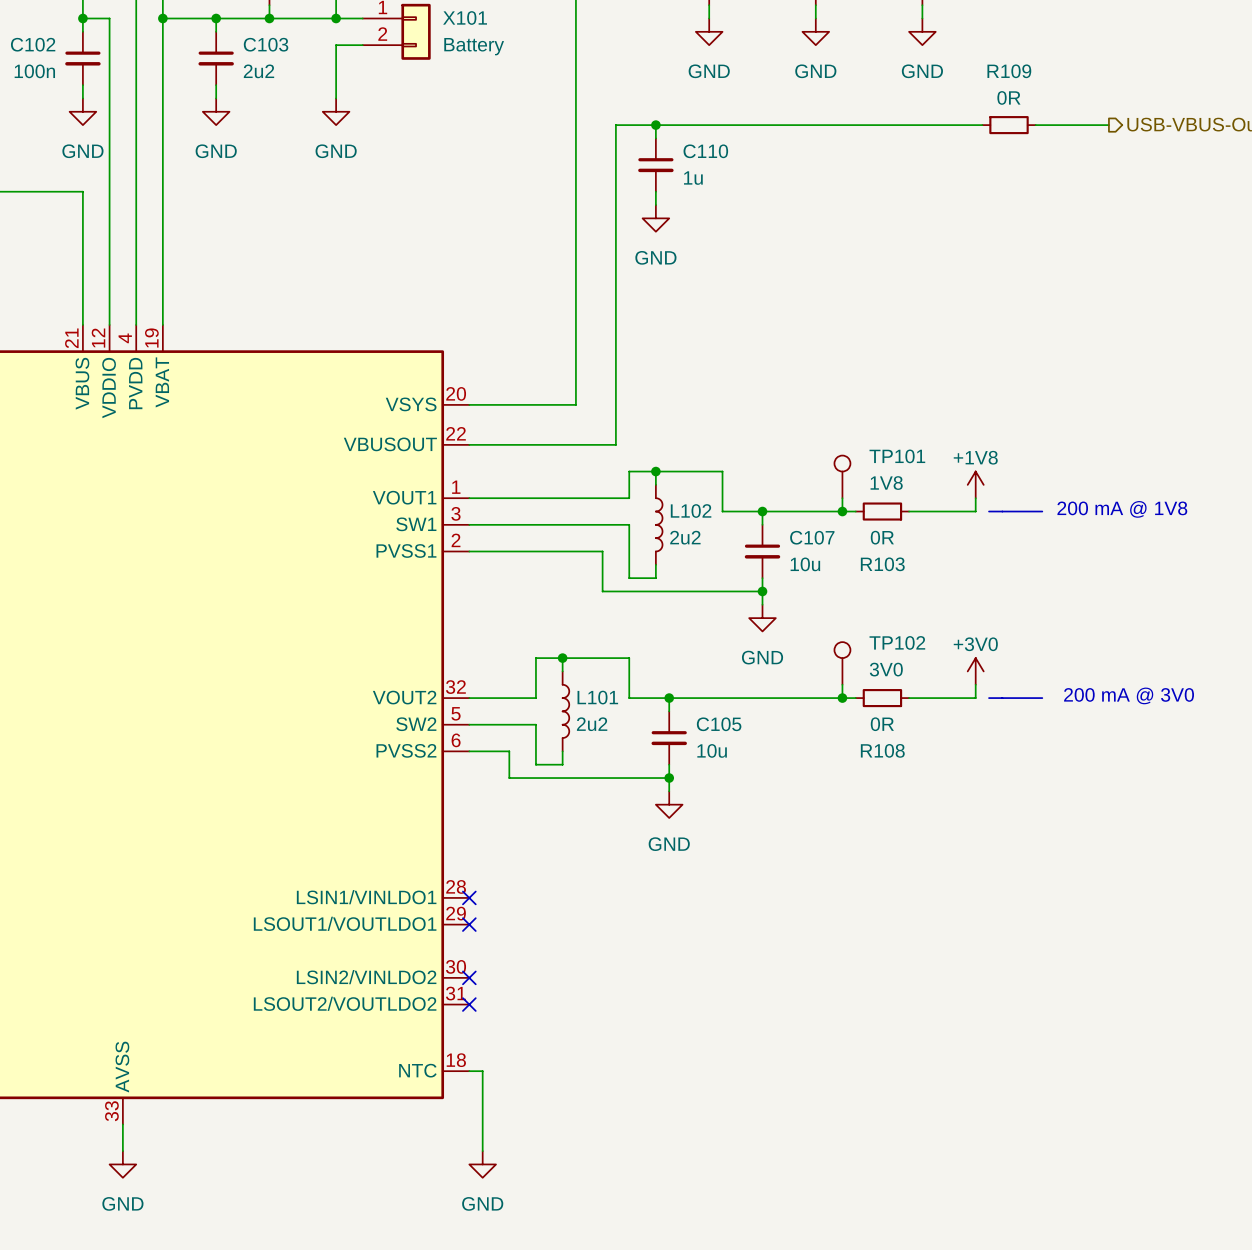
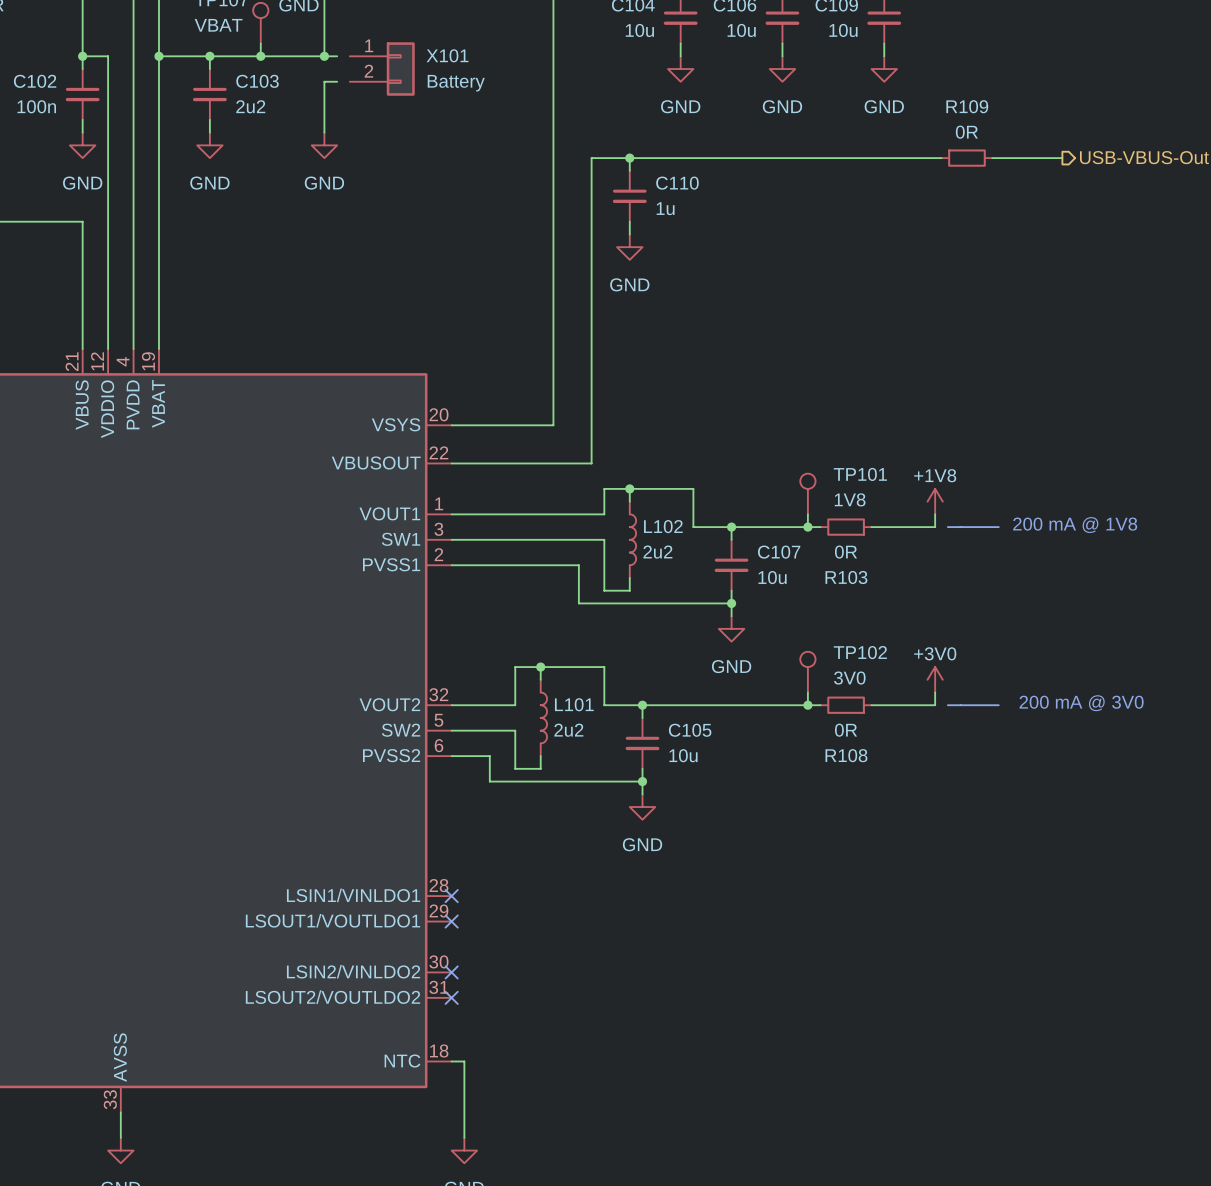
wire: (349, 18) (362, 18) -> none
wire: (349, 45) (362, 45) -> none

